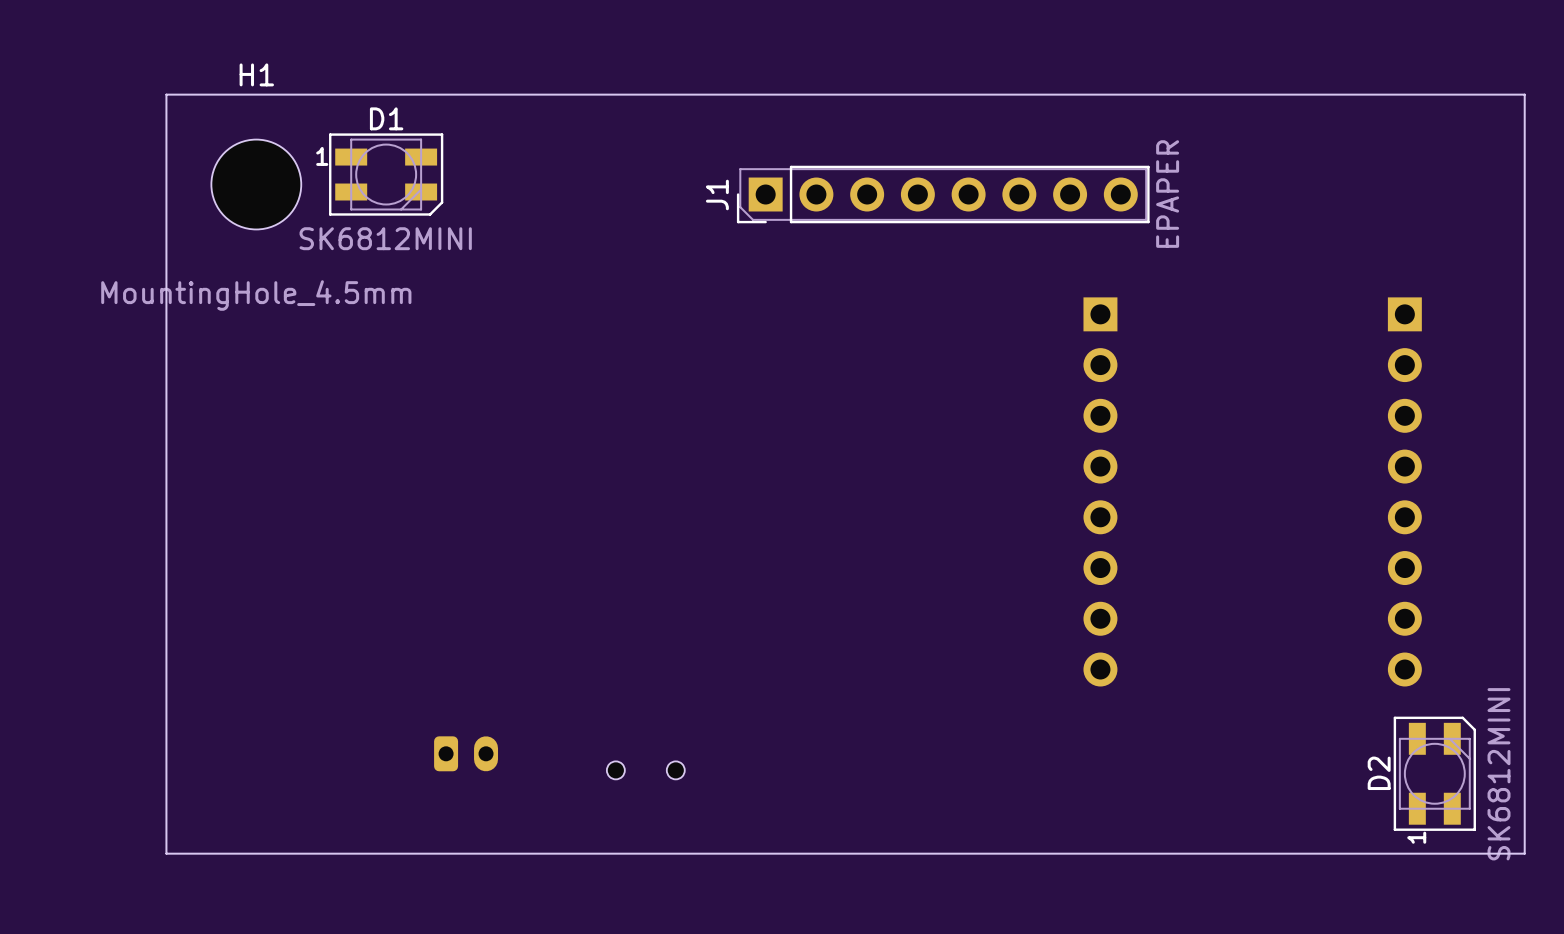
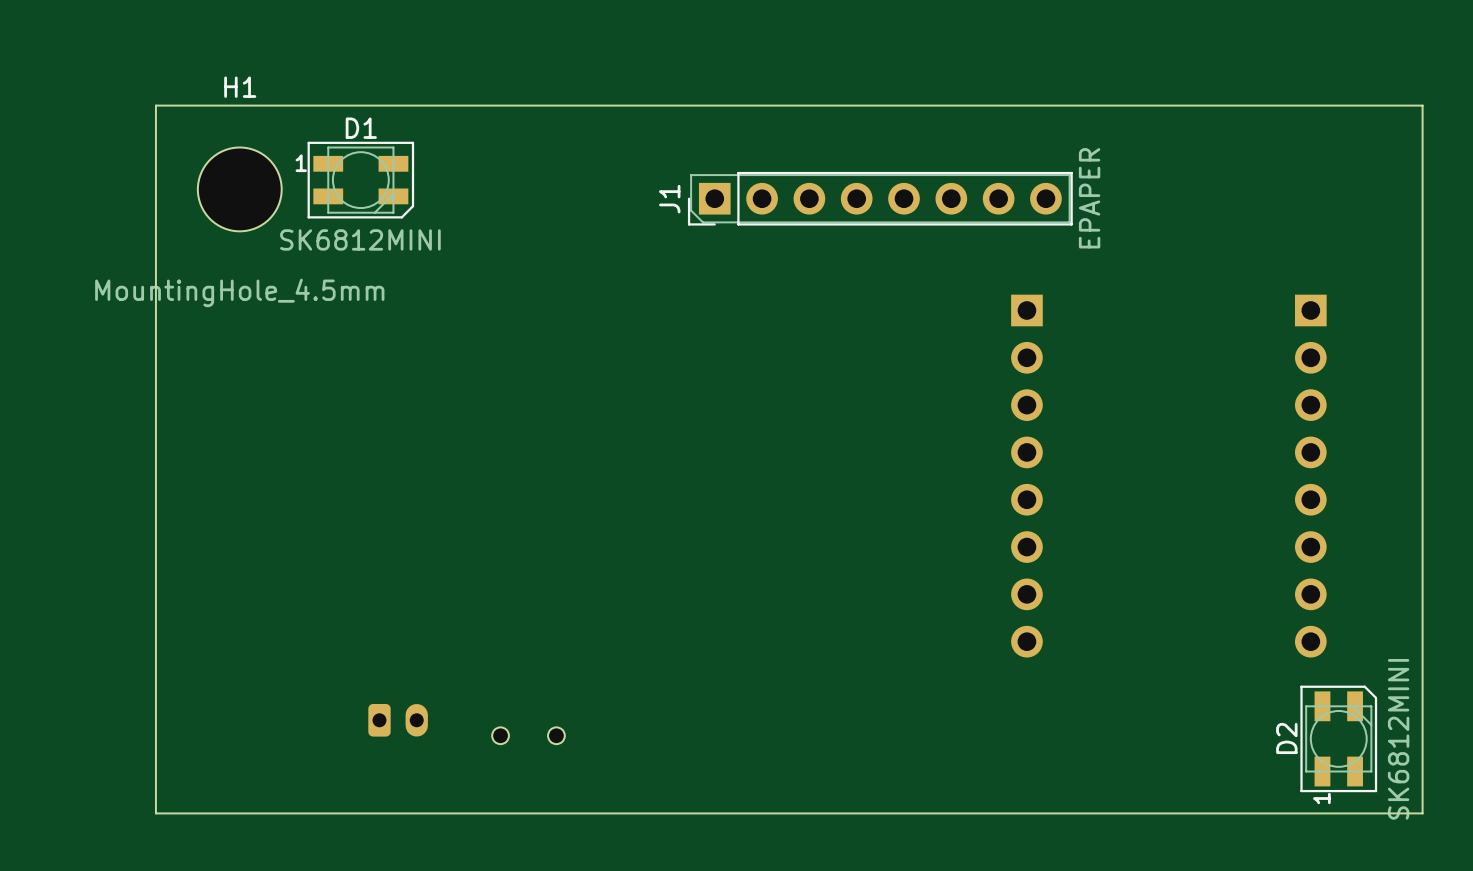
part position: (466, 753) -> (398, 720)
part position: (645, 770) -> (528, 735)

